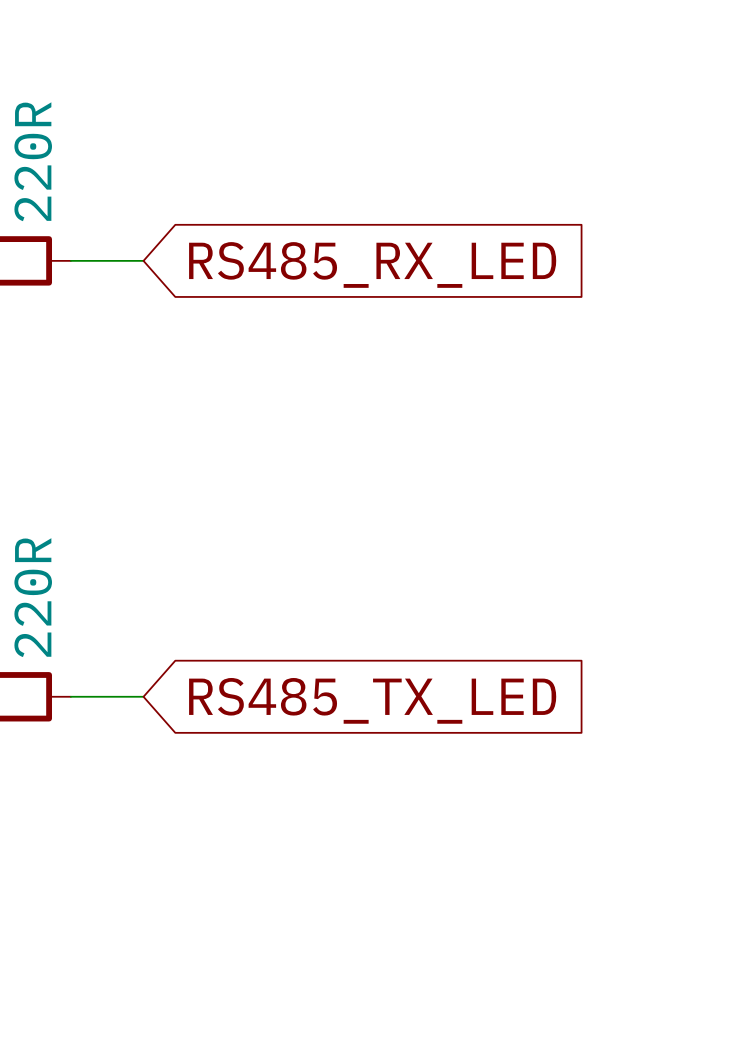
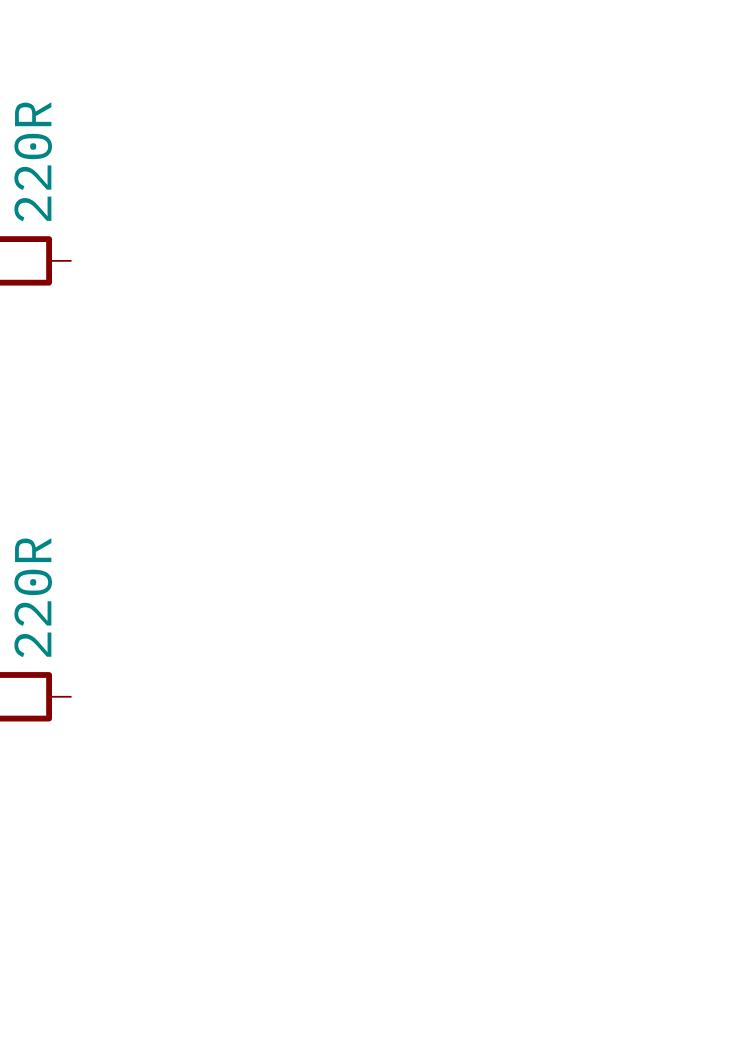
wire: (70, 260) (143, 260) -> none
global label: RS485_RX_LED (372, 264) -> none
wire: (70, 696) (143, 696) -> none
global label: RS485_TX_LED (372, 700) -> none

